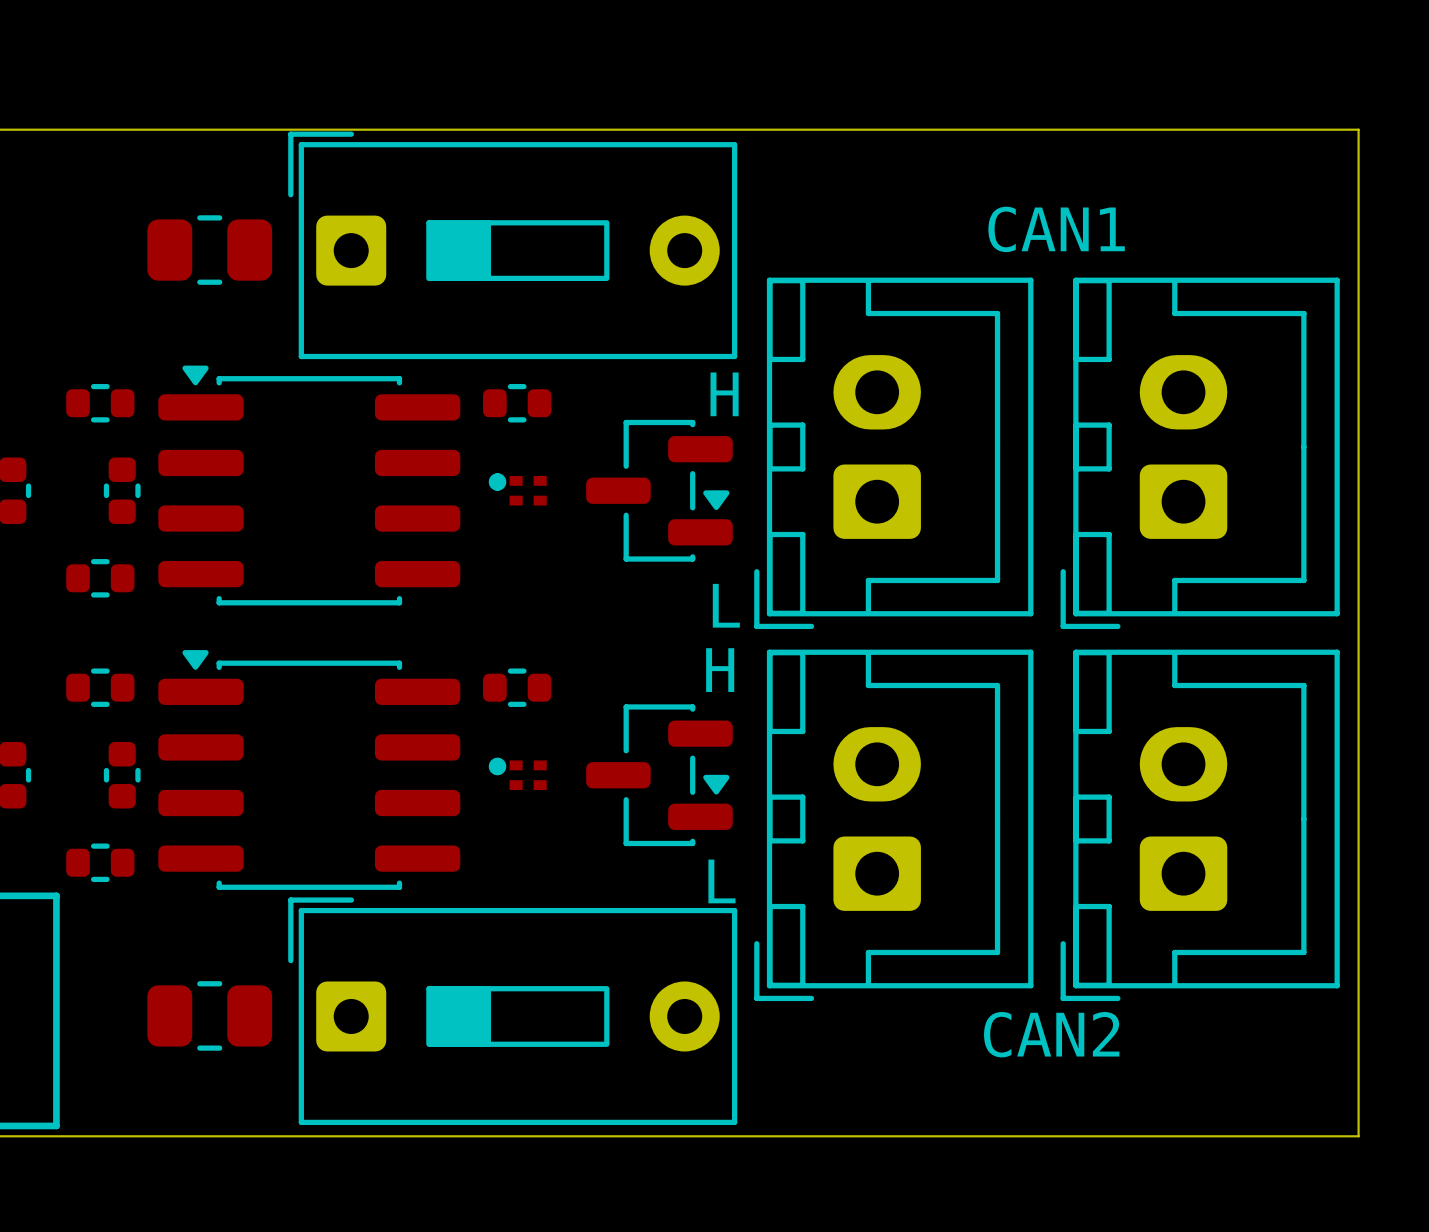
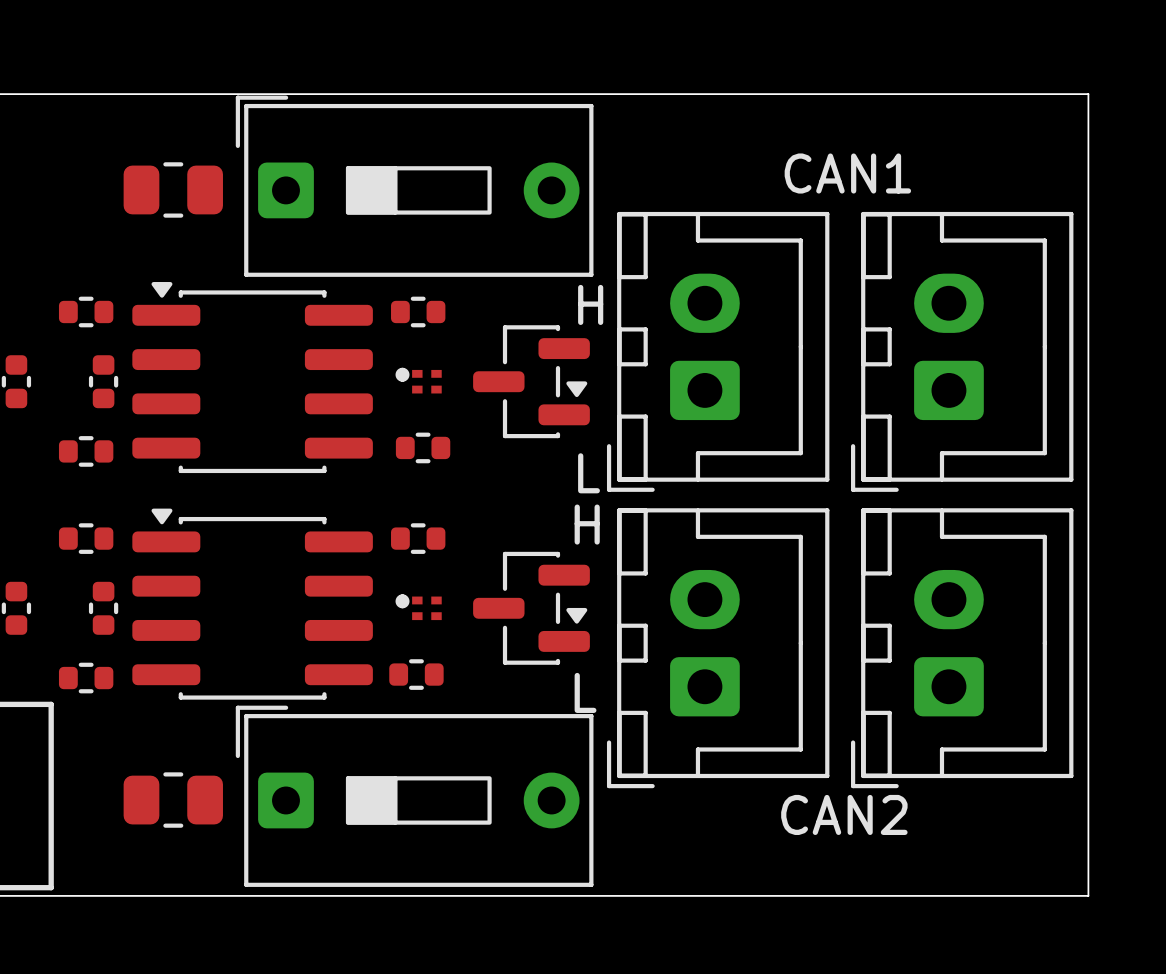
part: none -> (423, 447)
part: none -> (416, 674)

